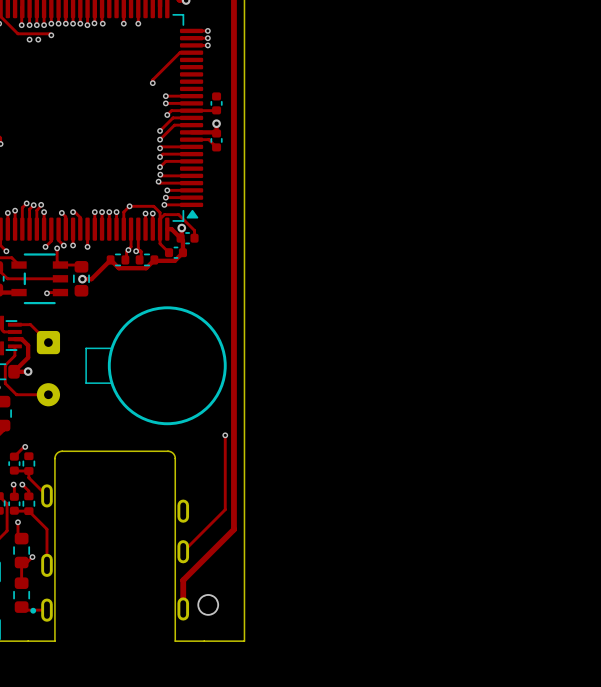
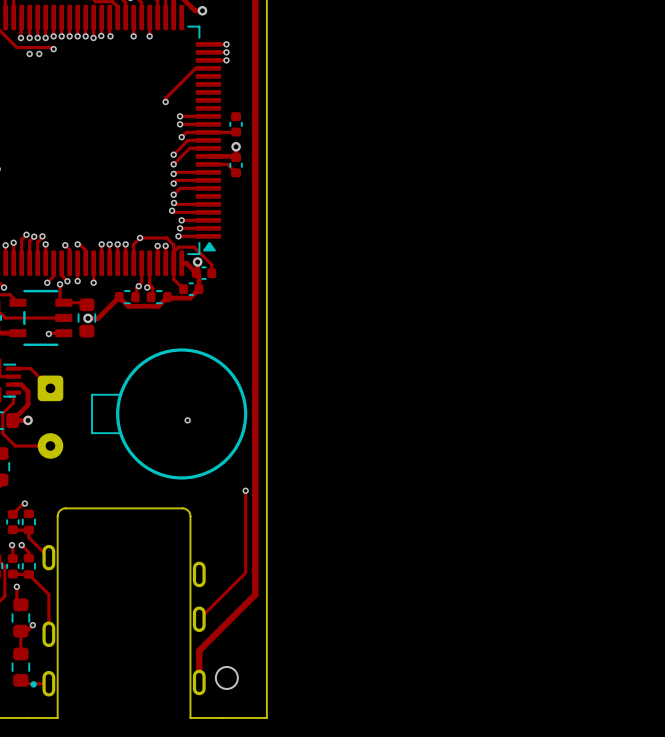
via: none -> (187, 420)

